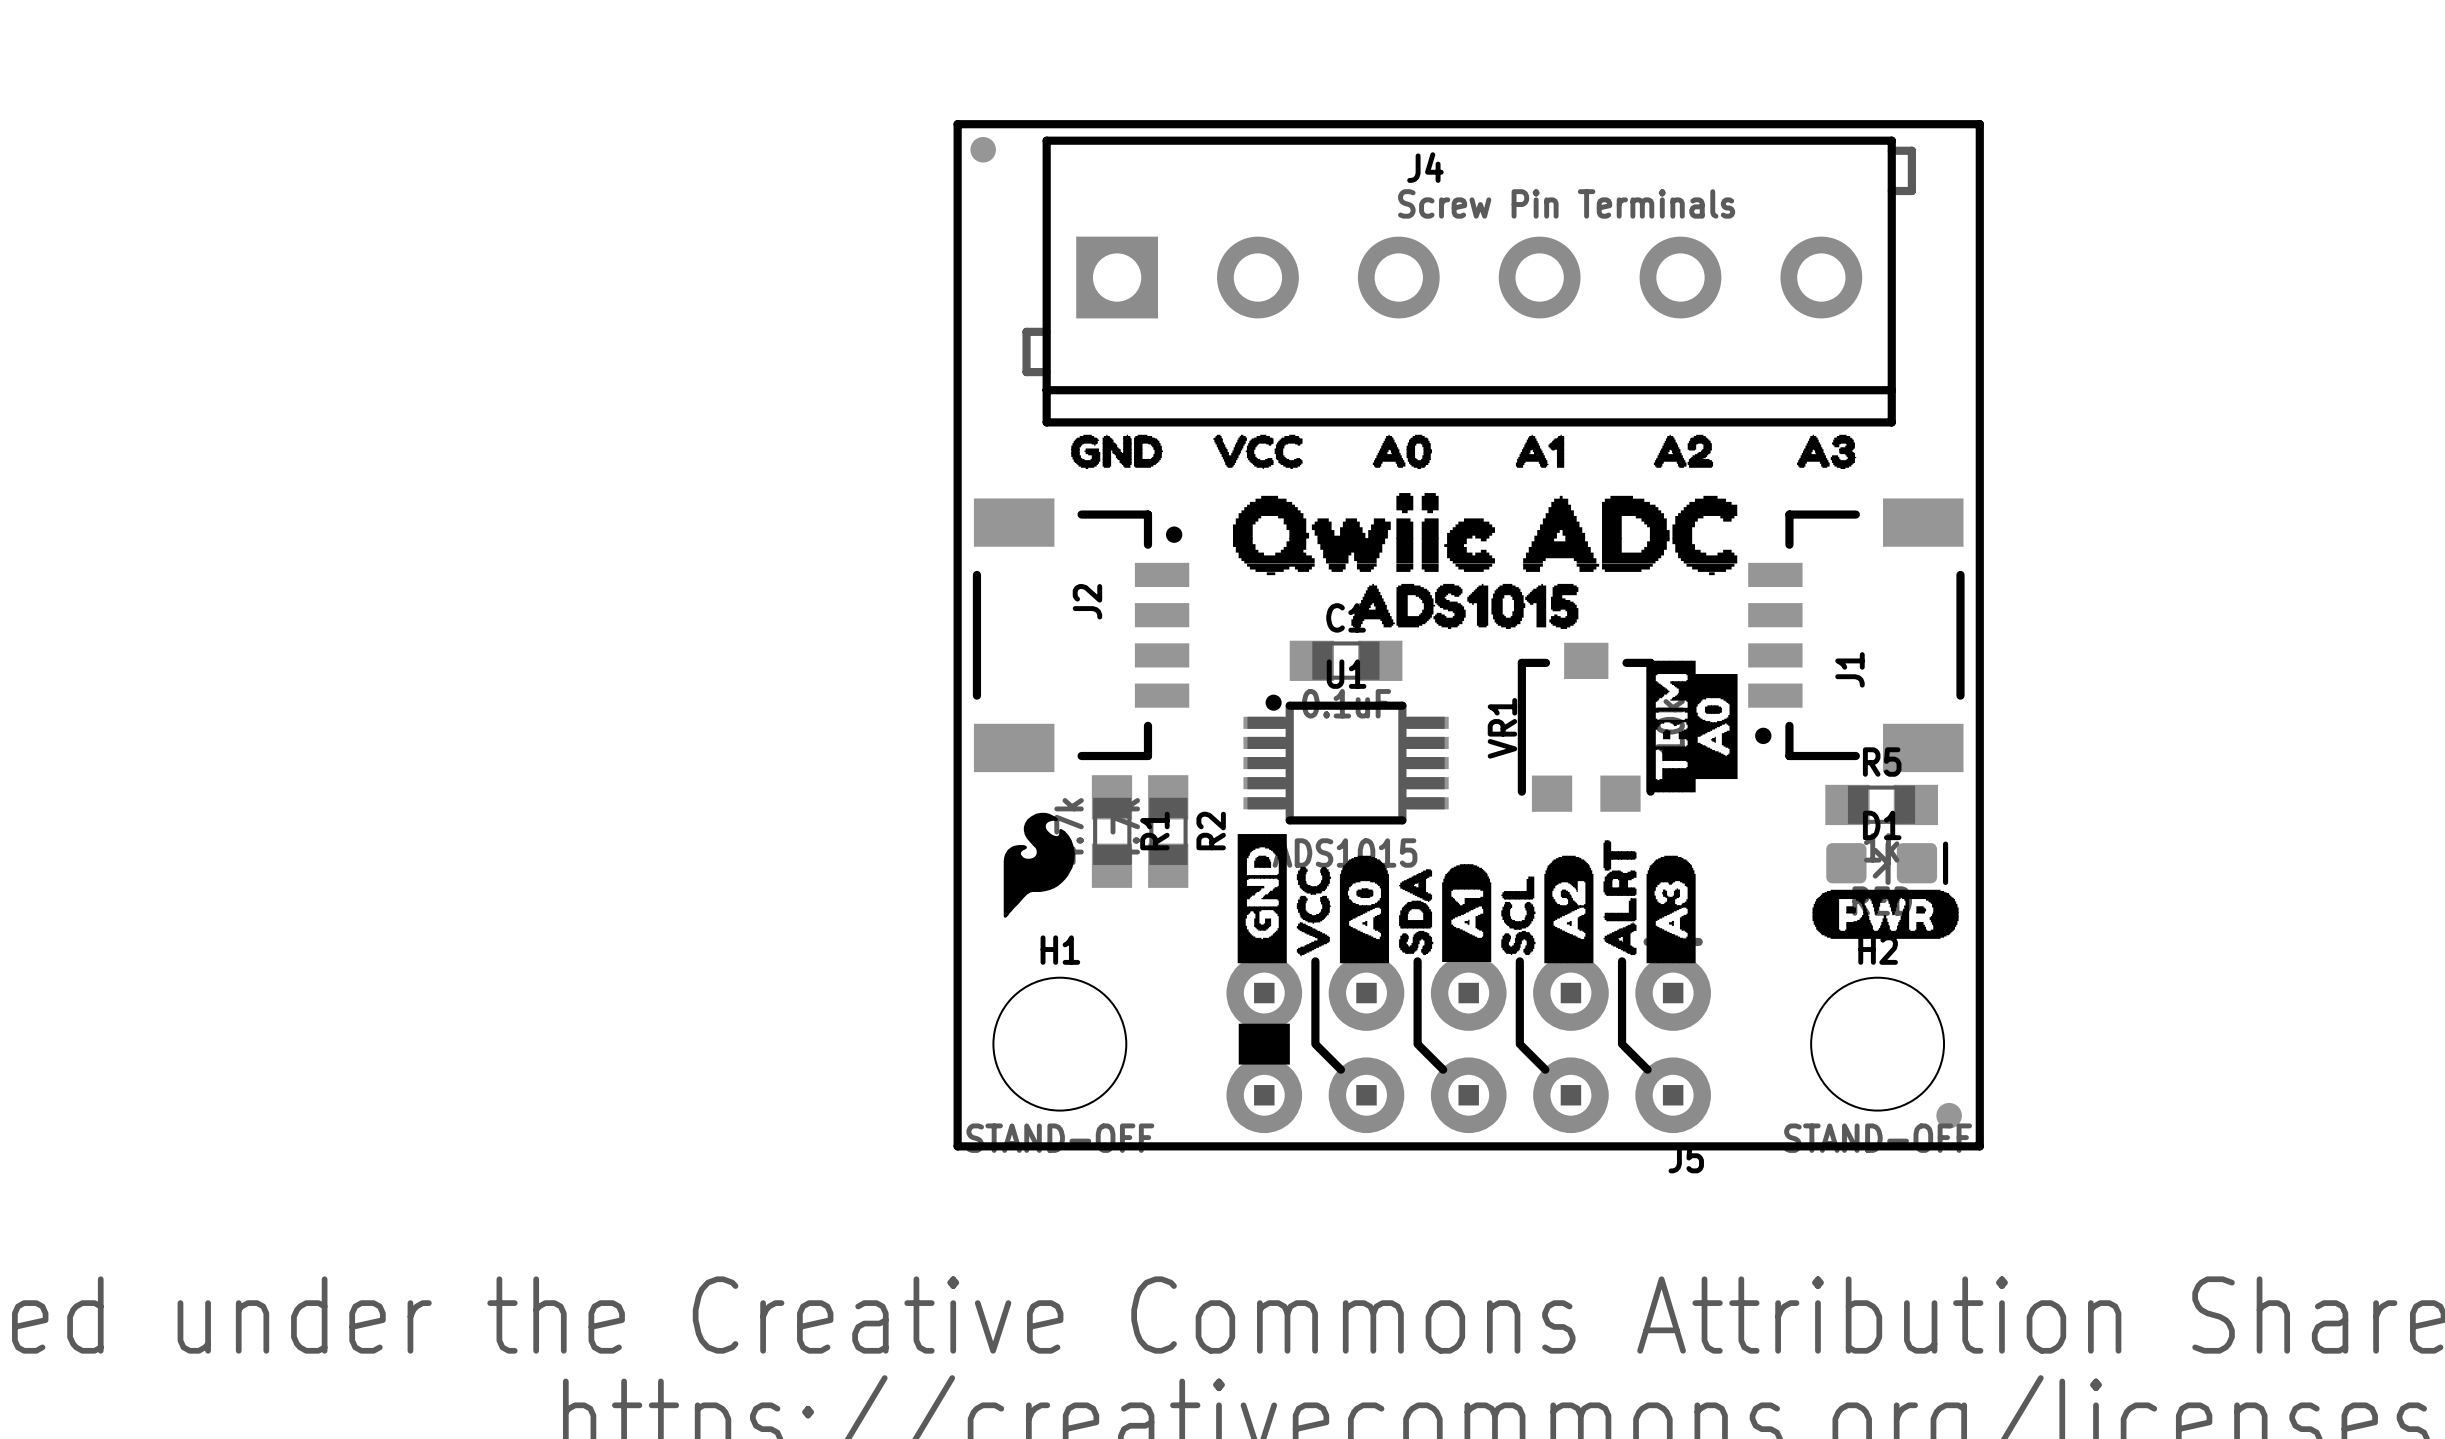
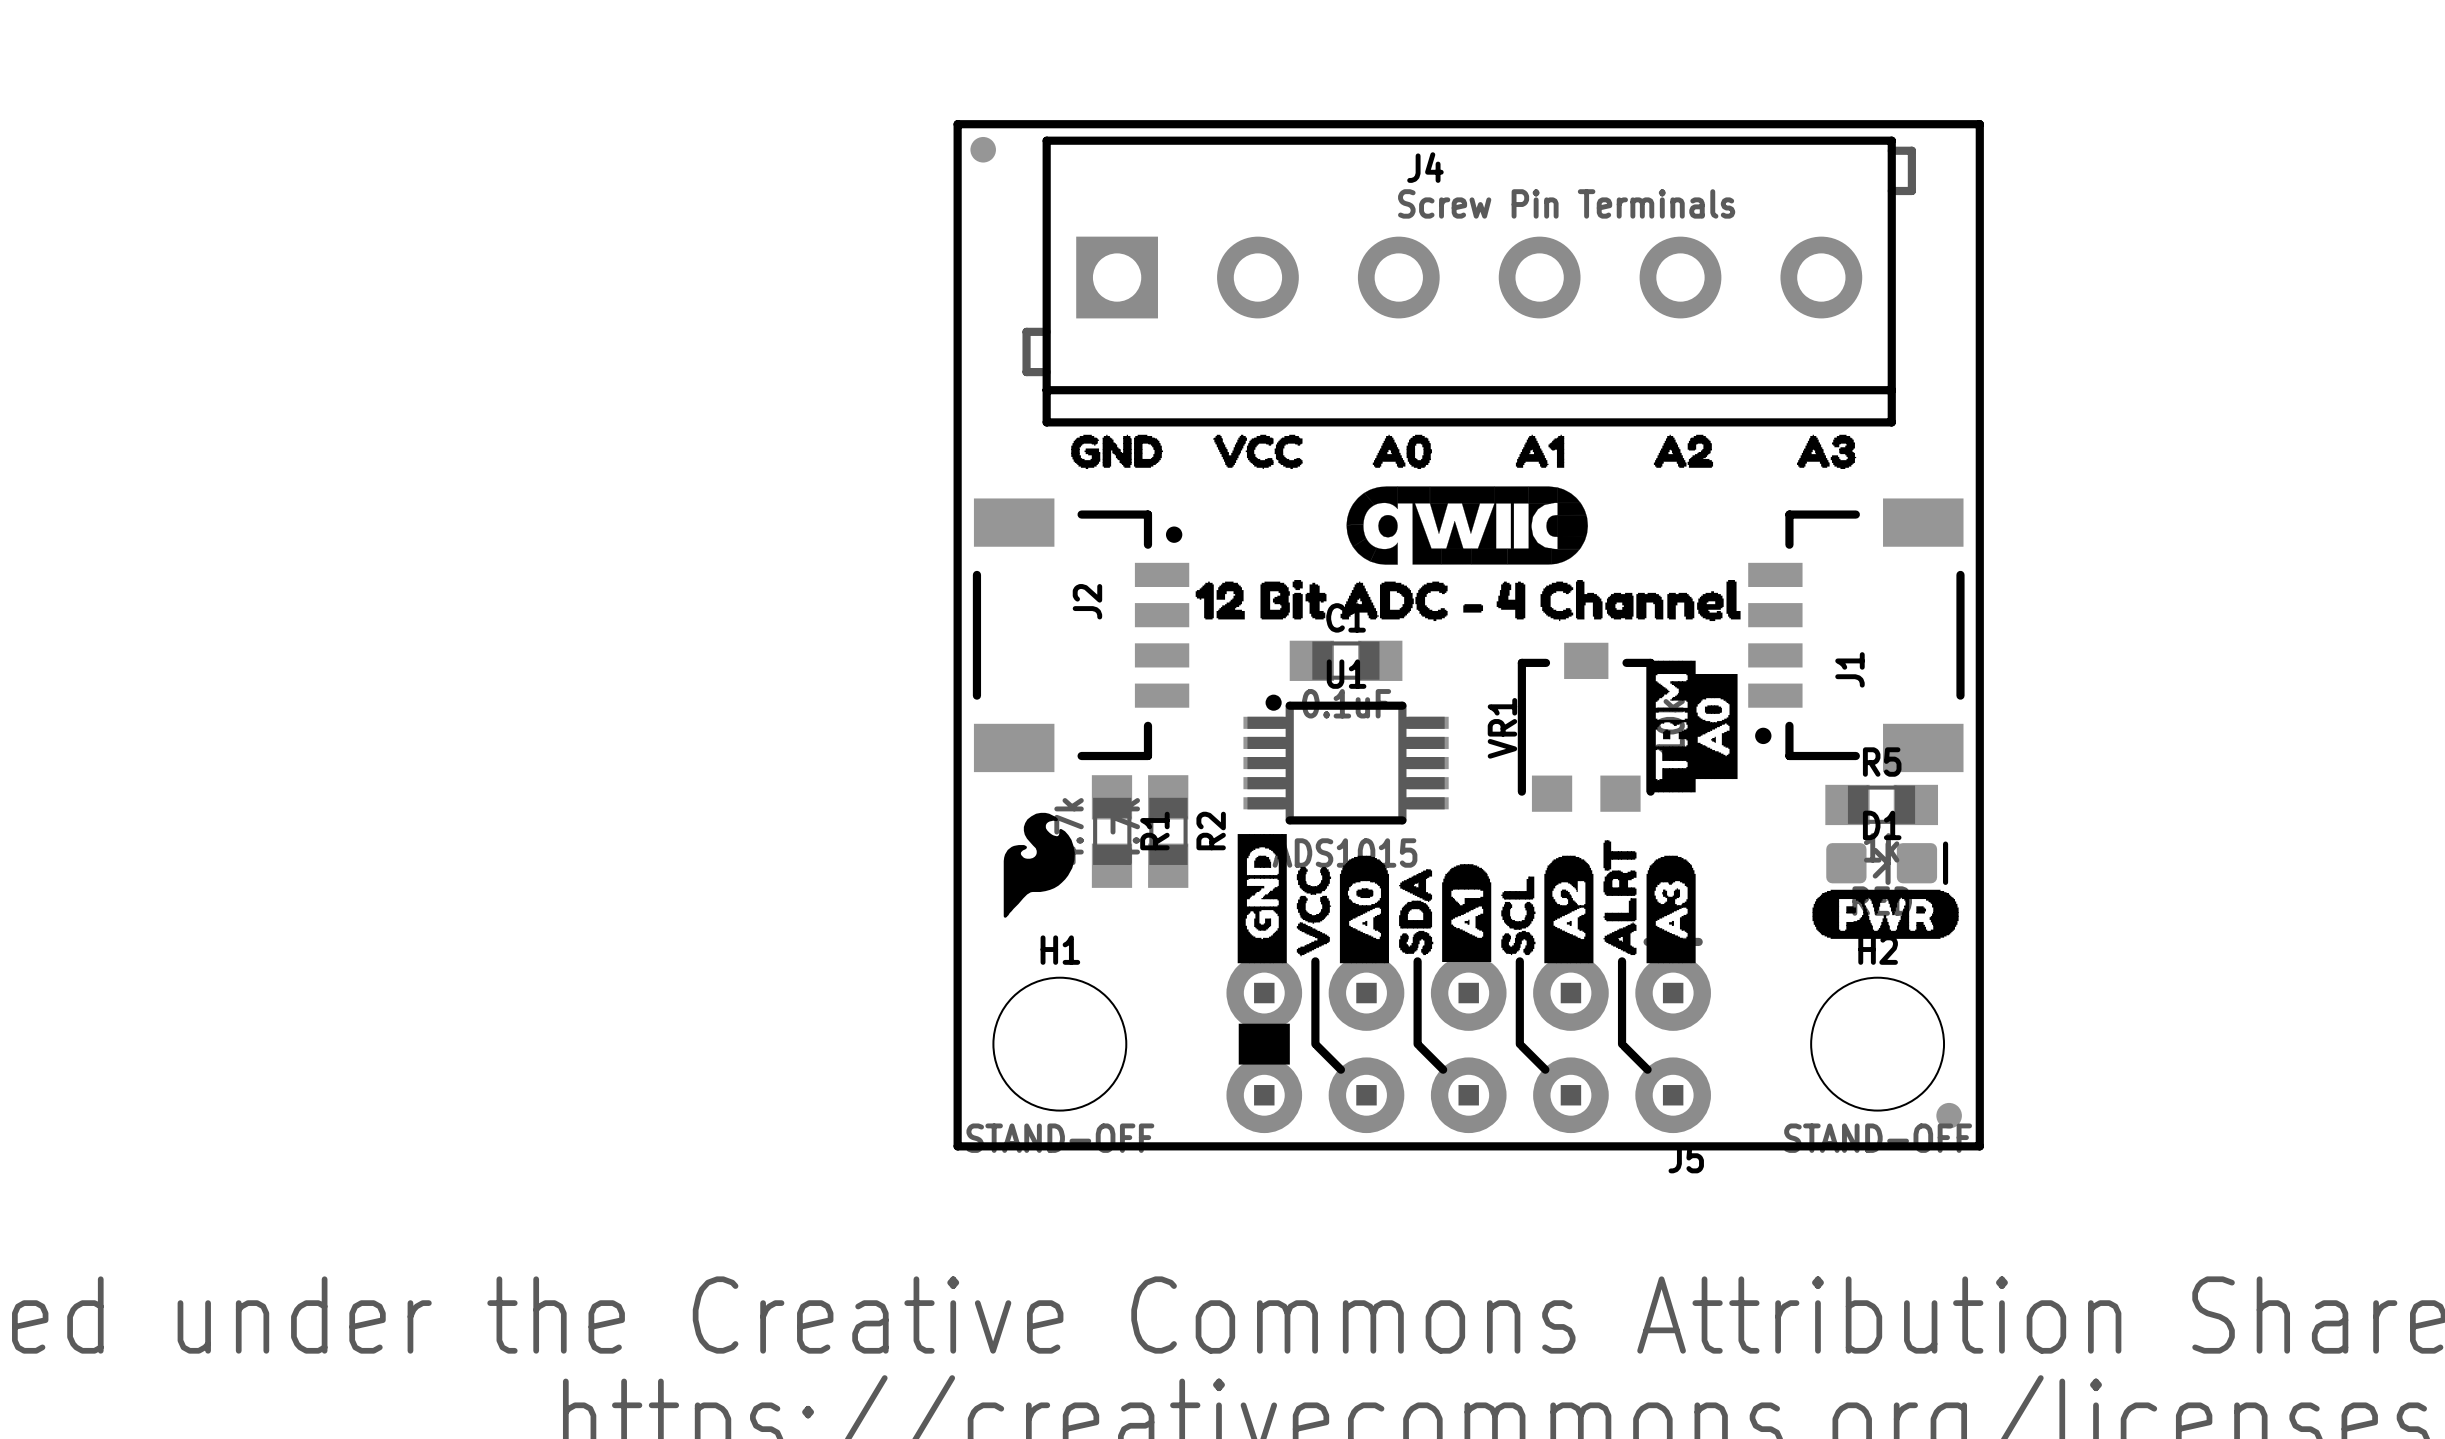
drawing shape: [1232, 493, 1738, 576] -> [1346, 486, 1588, 565]
drawing shape: [1351, 583, 1579, 629] -> [1195, 580, 1741, 622]

